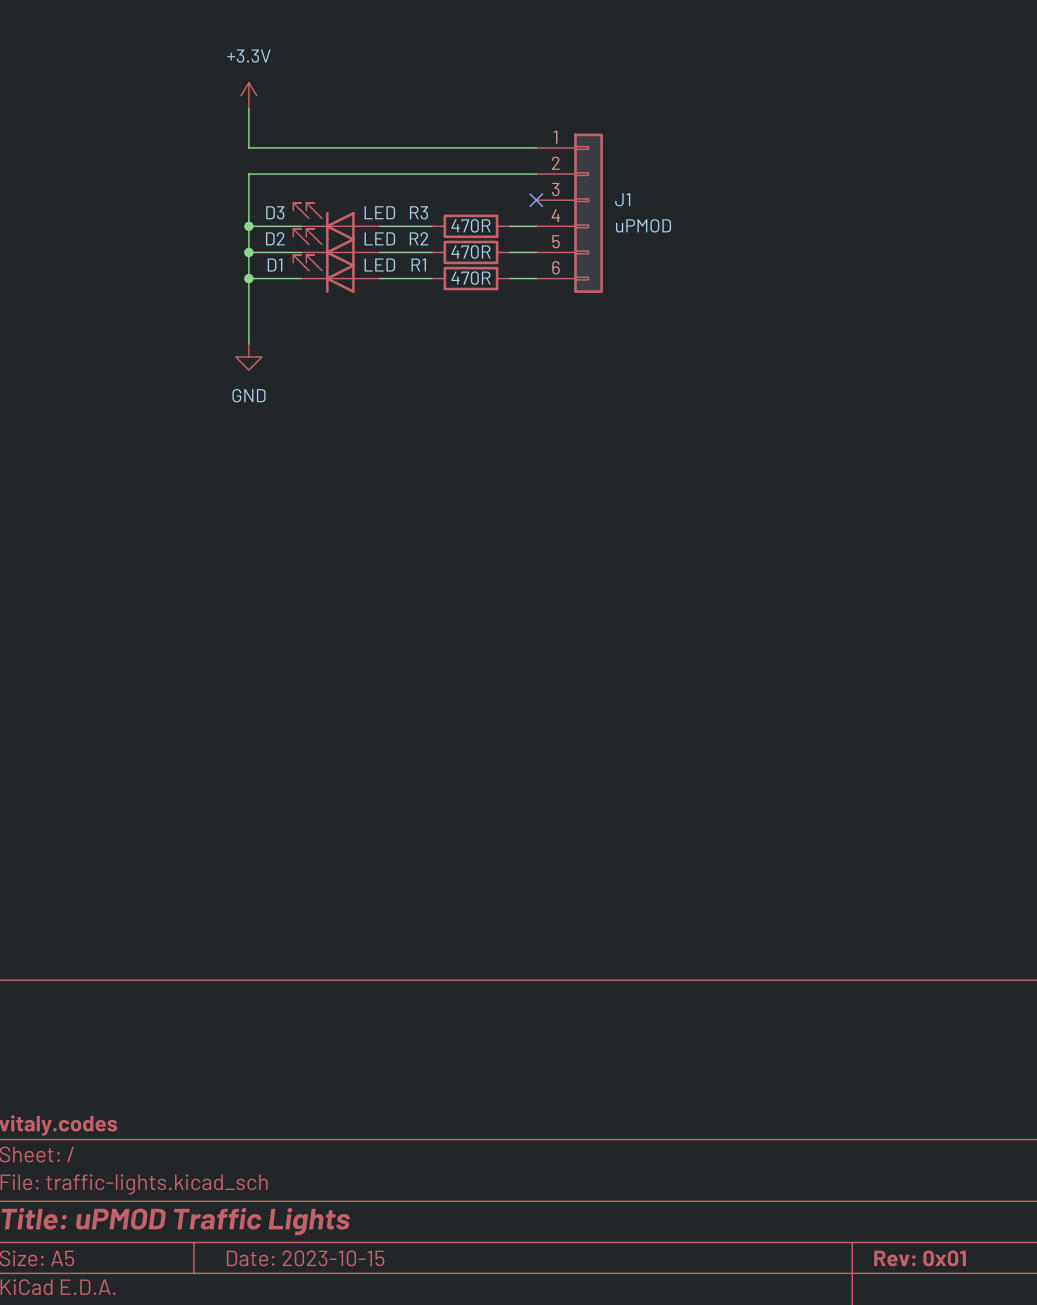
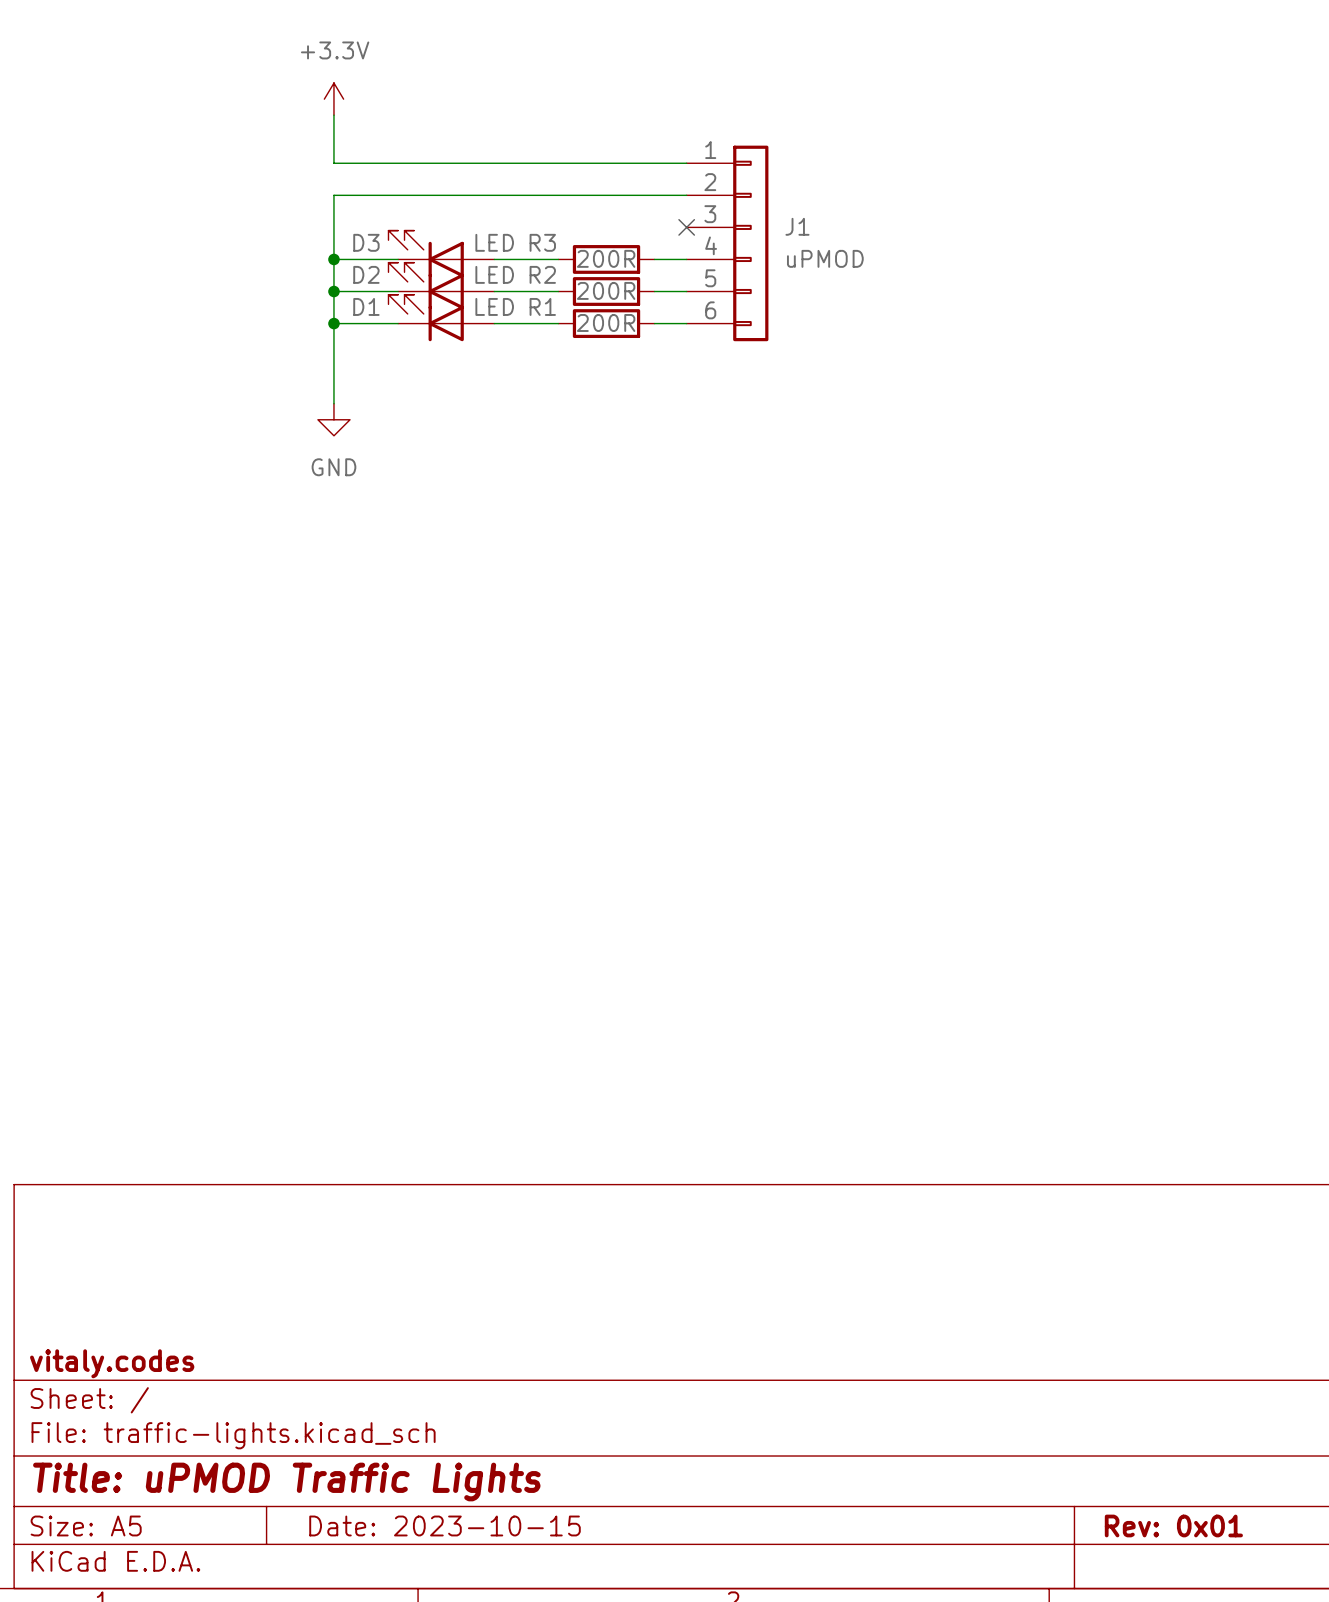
R3 value: 470R (470, 225) -> 200R (606, 258)
R2 value: 470R (470, 251) -> 200R (606, 290)
R1 value: 470R (470, 278) -> 200R (606, 322)

